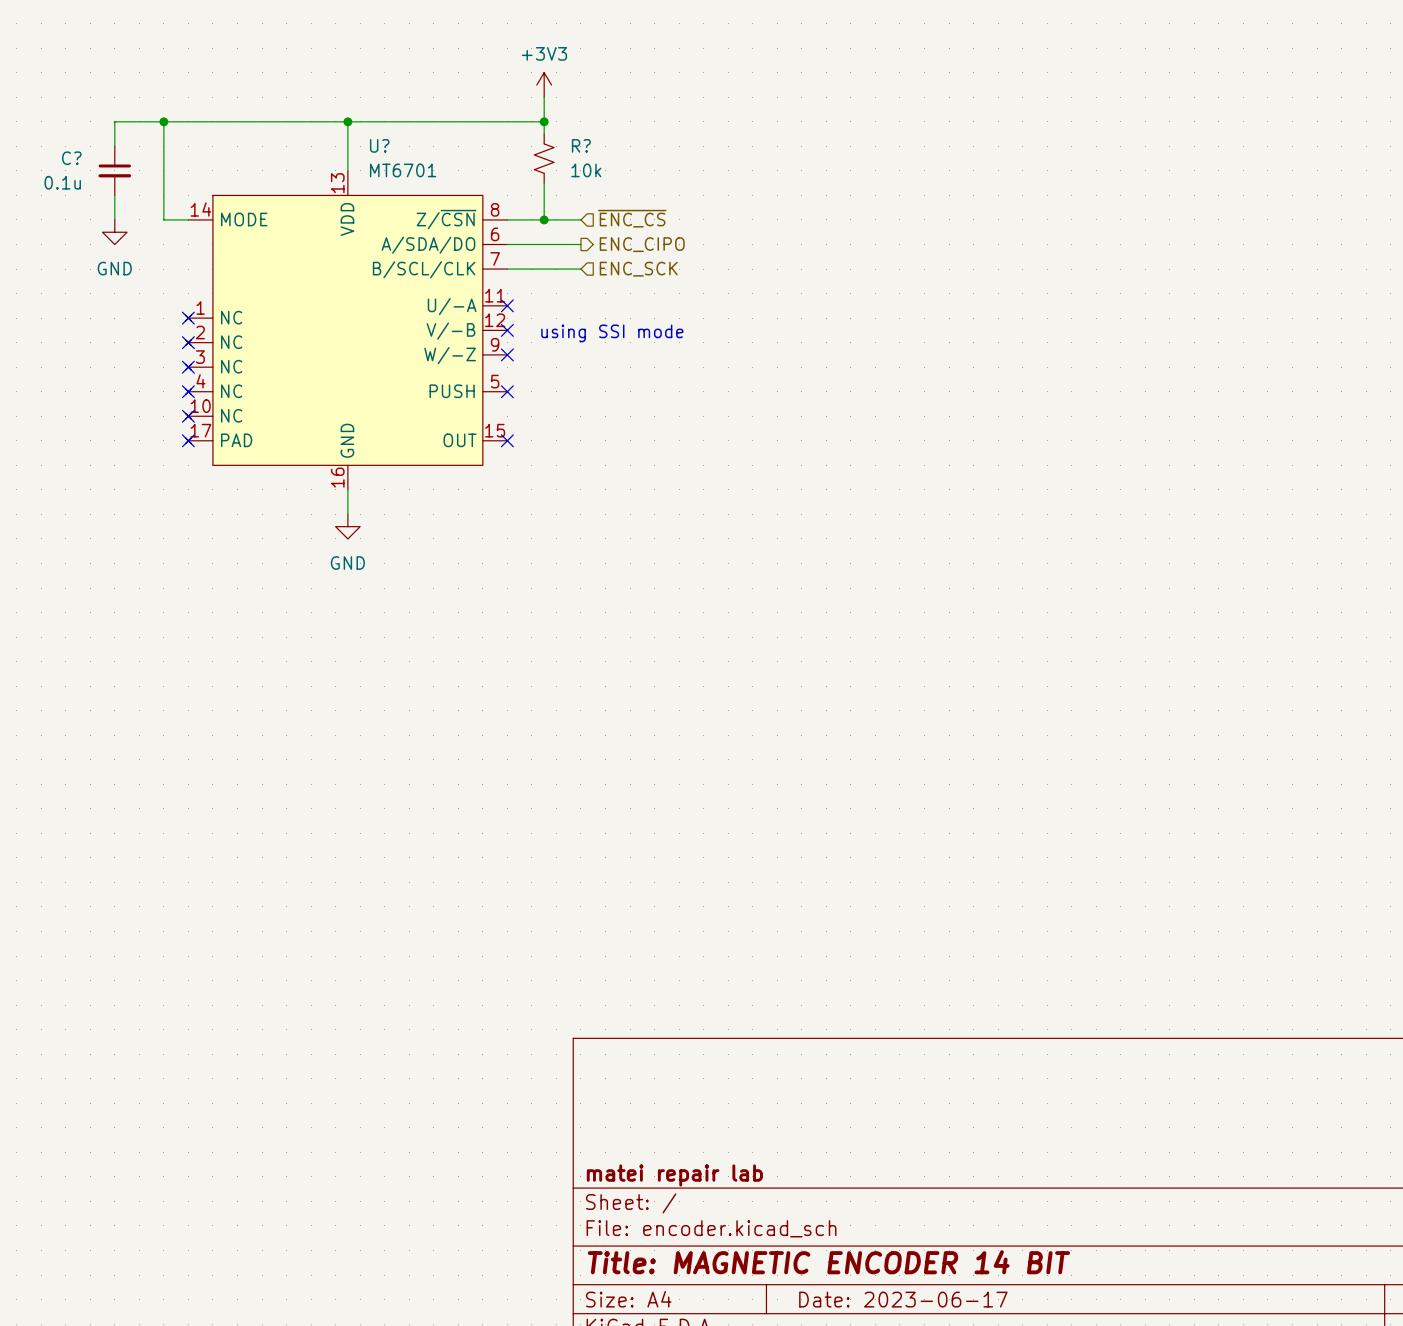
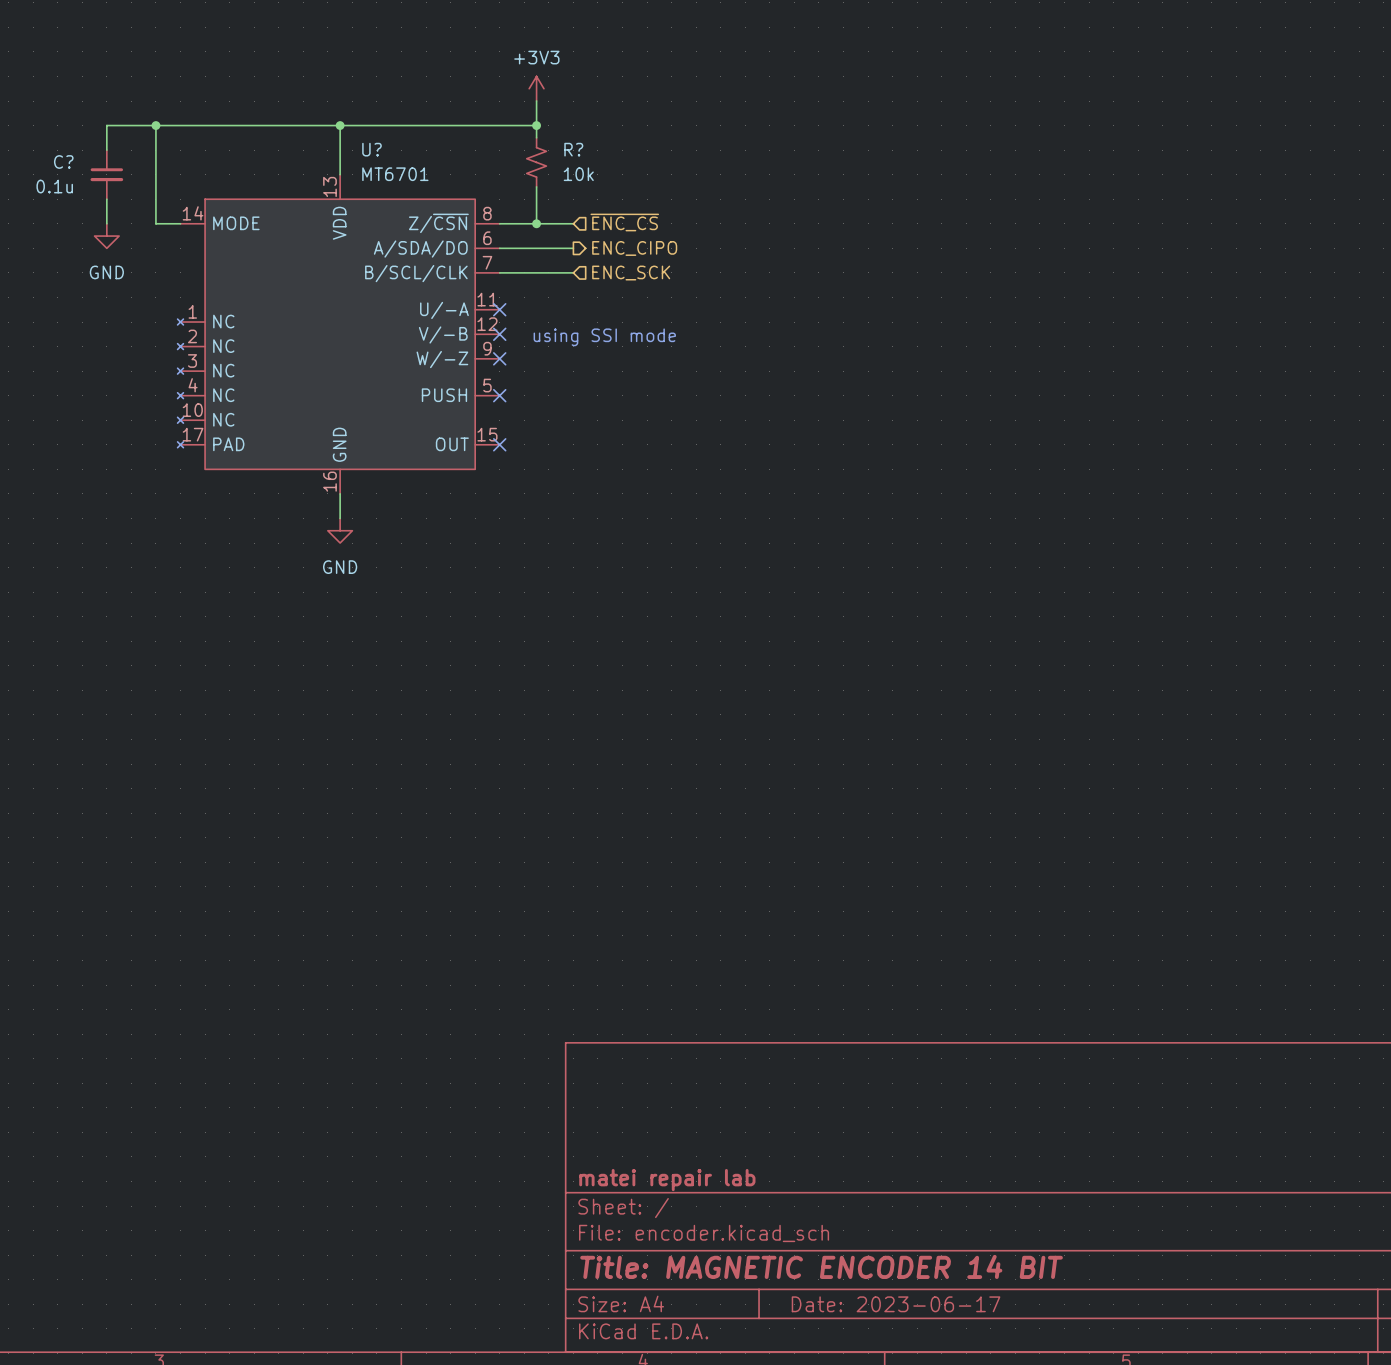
no-connect mark: (188, 318) -> none
no-connect mark: (188, 342) -> none
no-connect mark: (188, 367) -> none
no-connect mark: (188, 391) -> none
no-connect mark: (188, 416) -> none
no-connect mark: (188, 440) -> none

